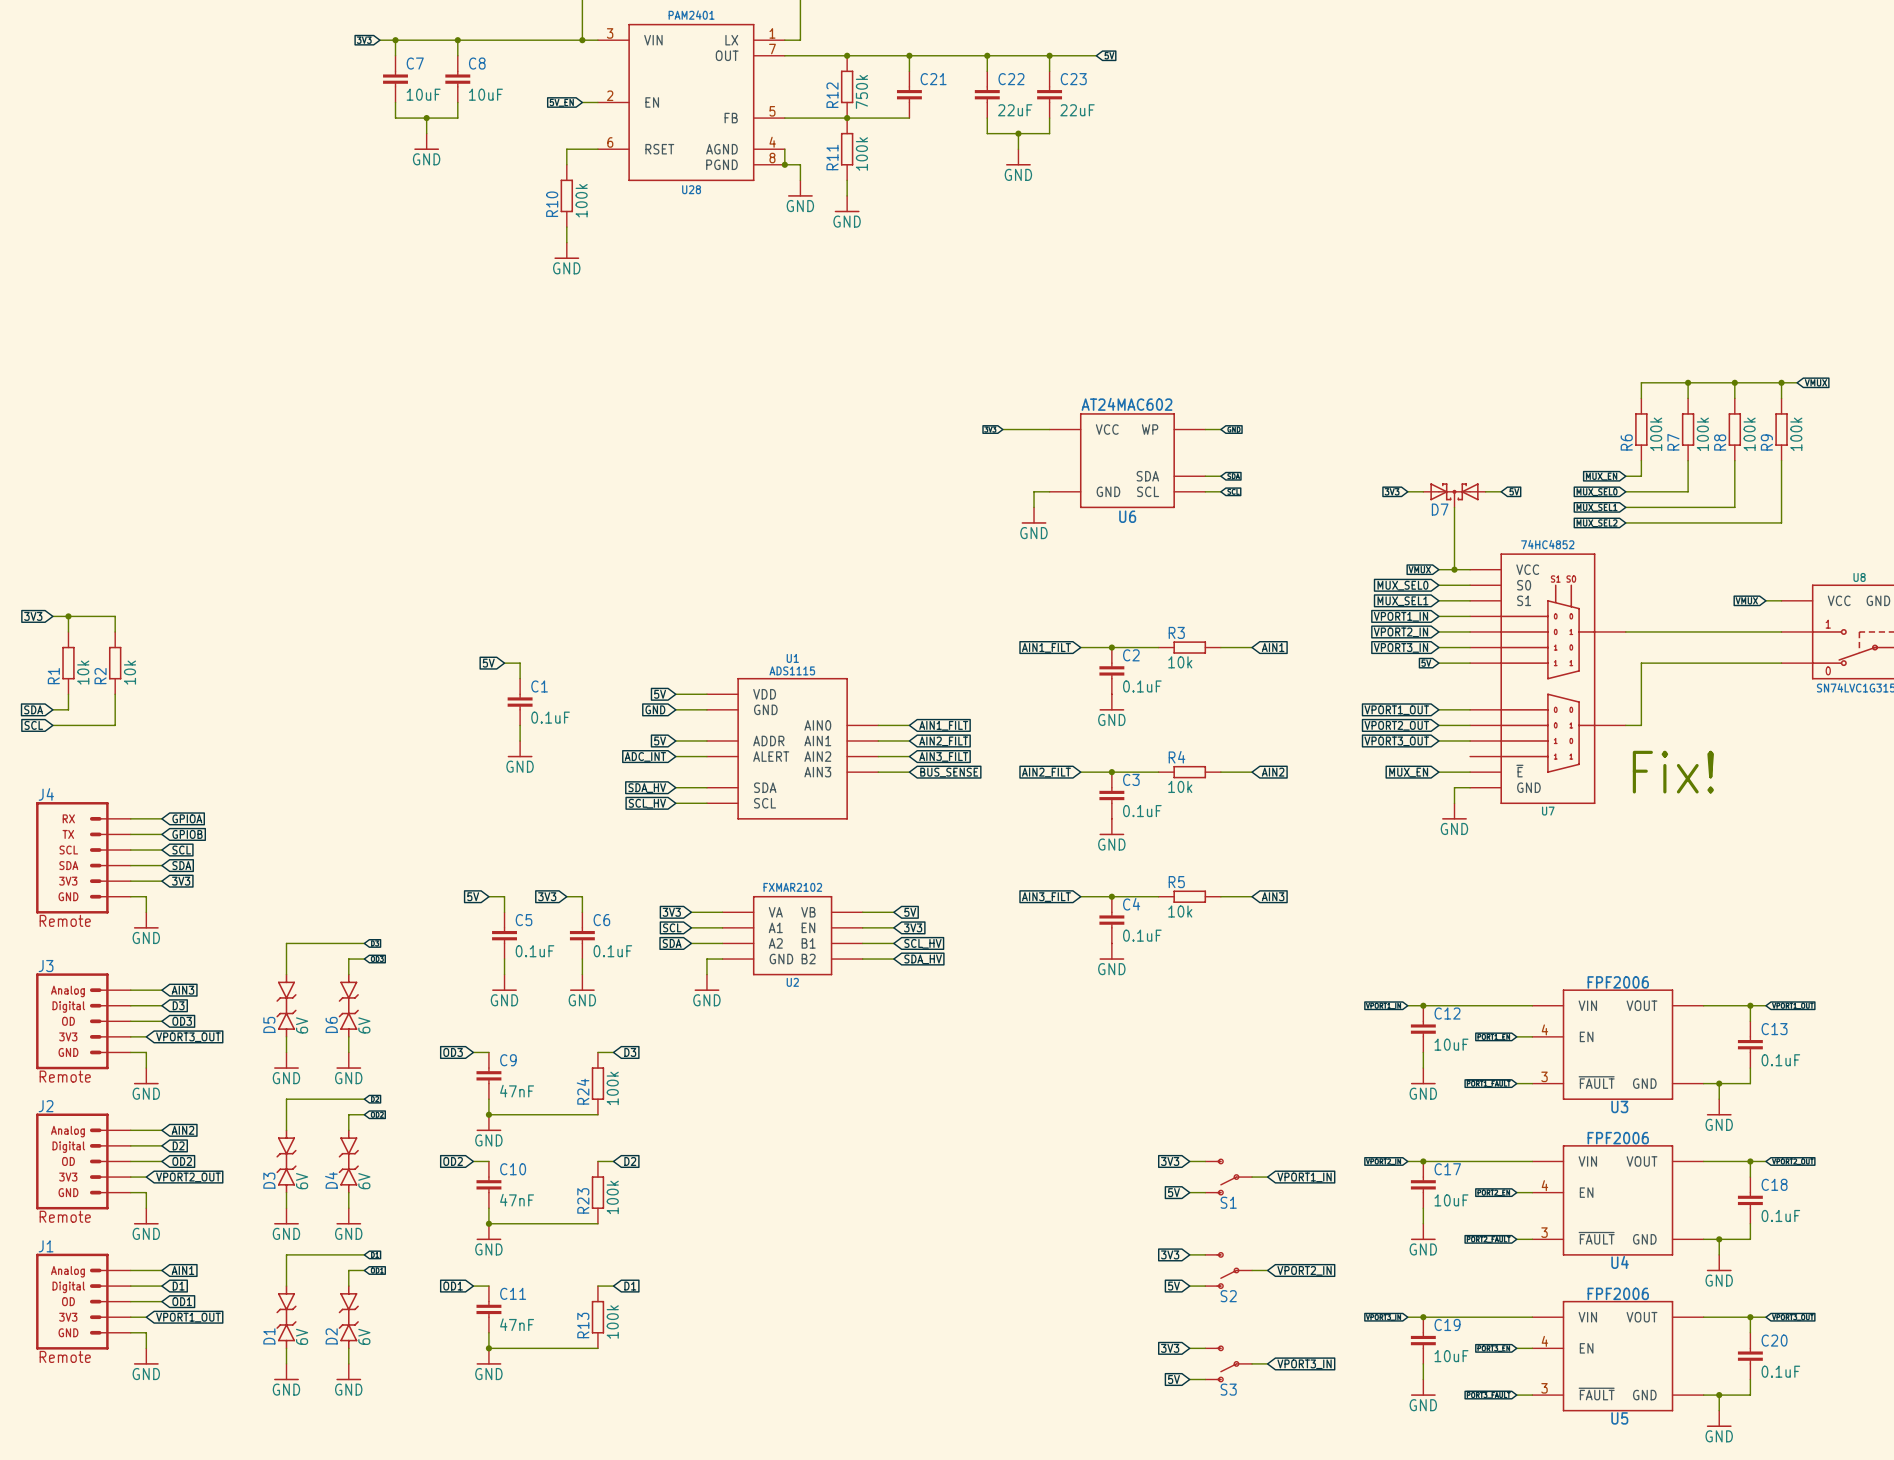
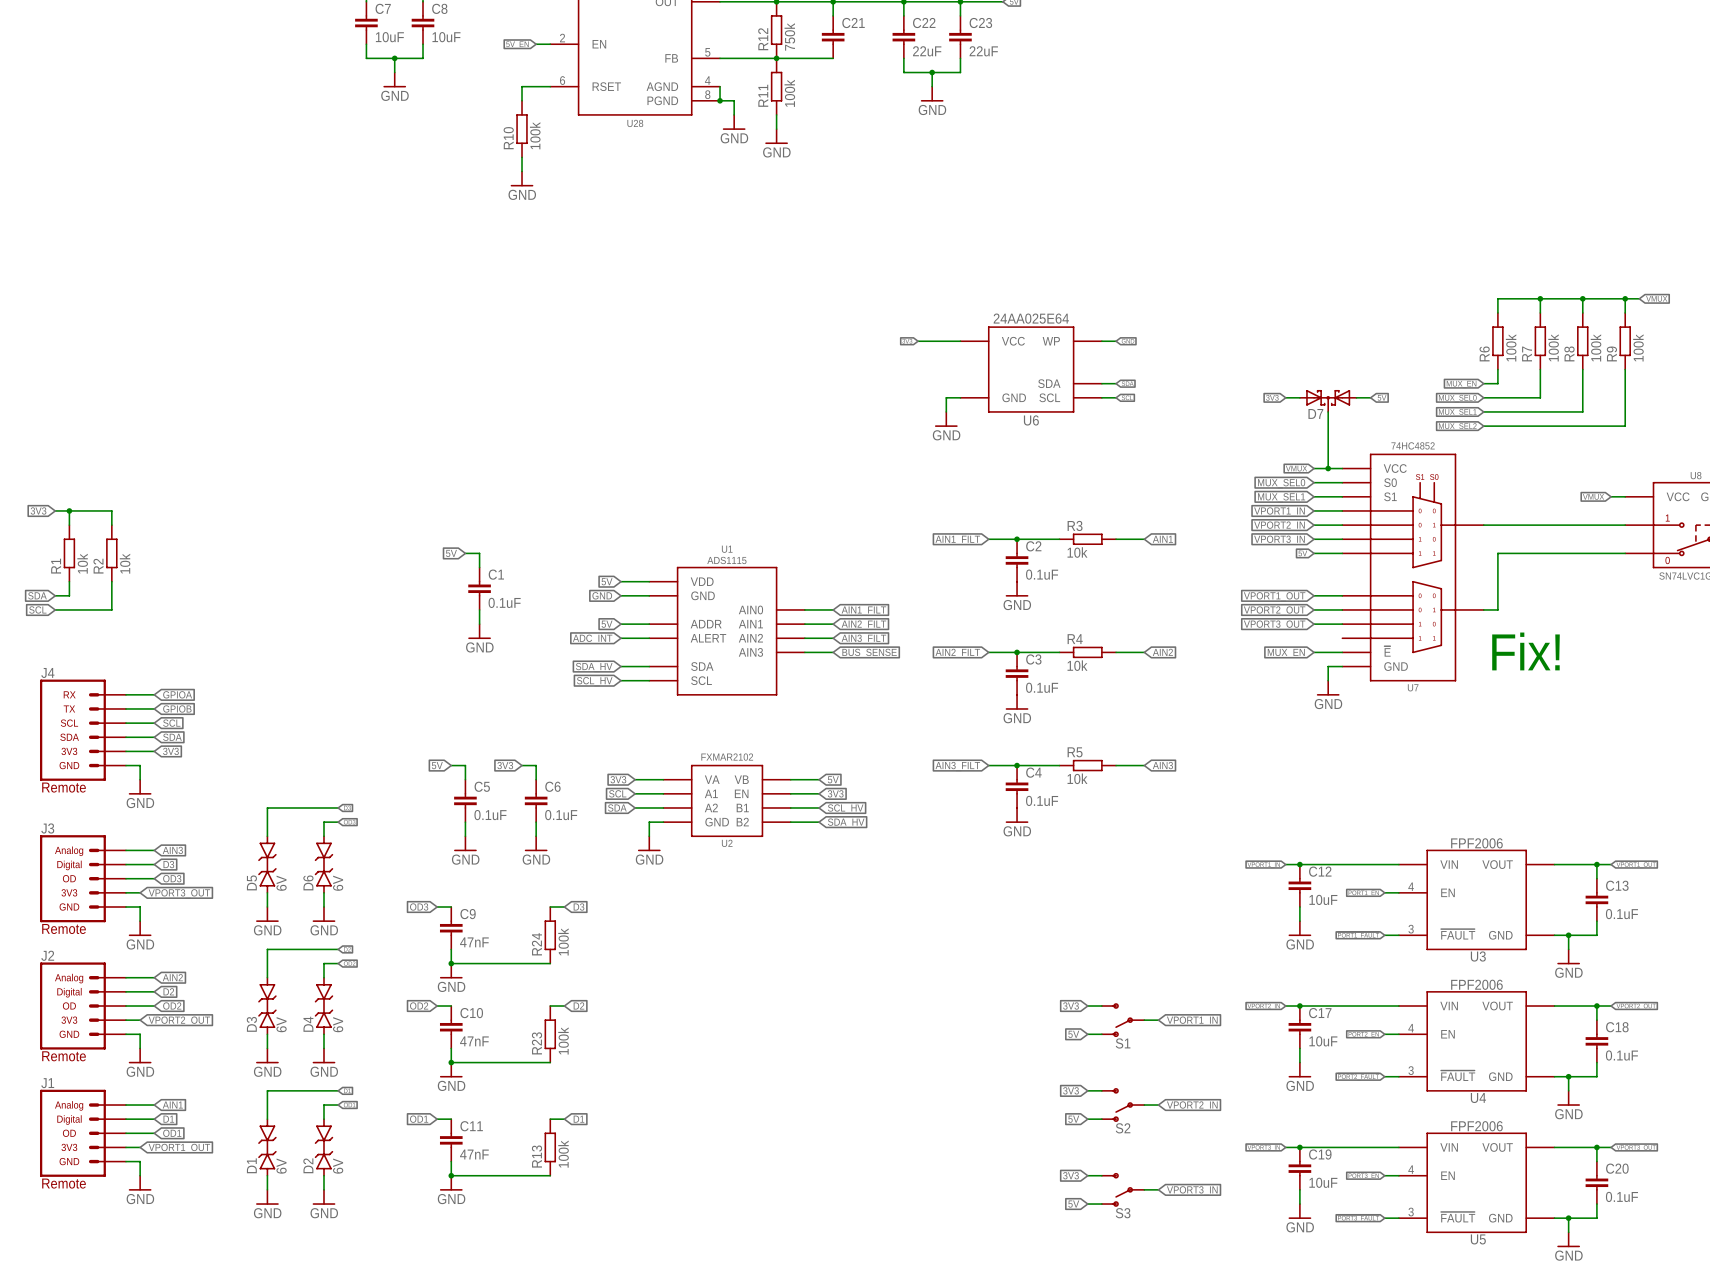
U6 text: AT24MAC602 (1126, 404) -> 24AA025E64 (1031, 318)

